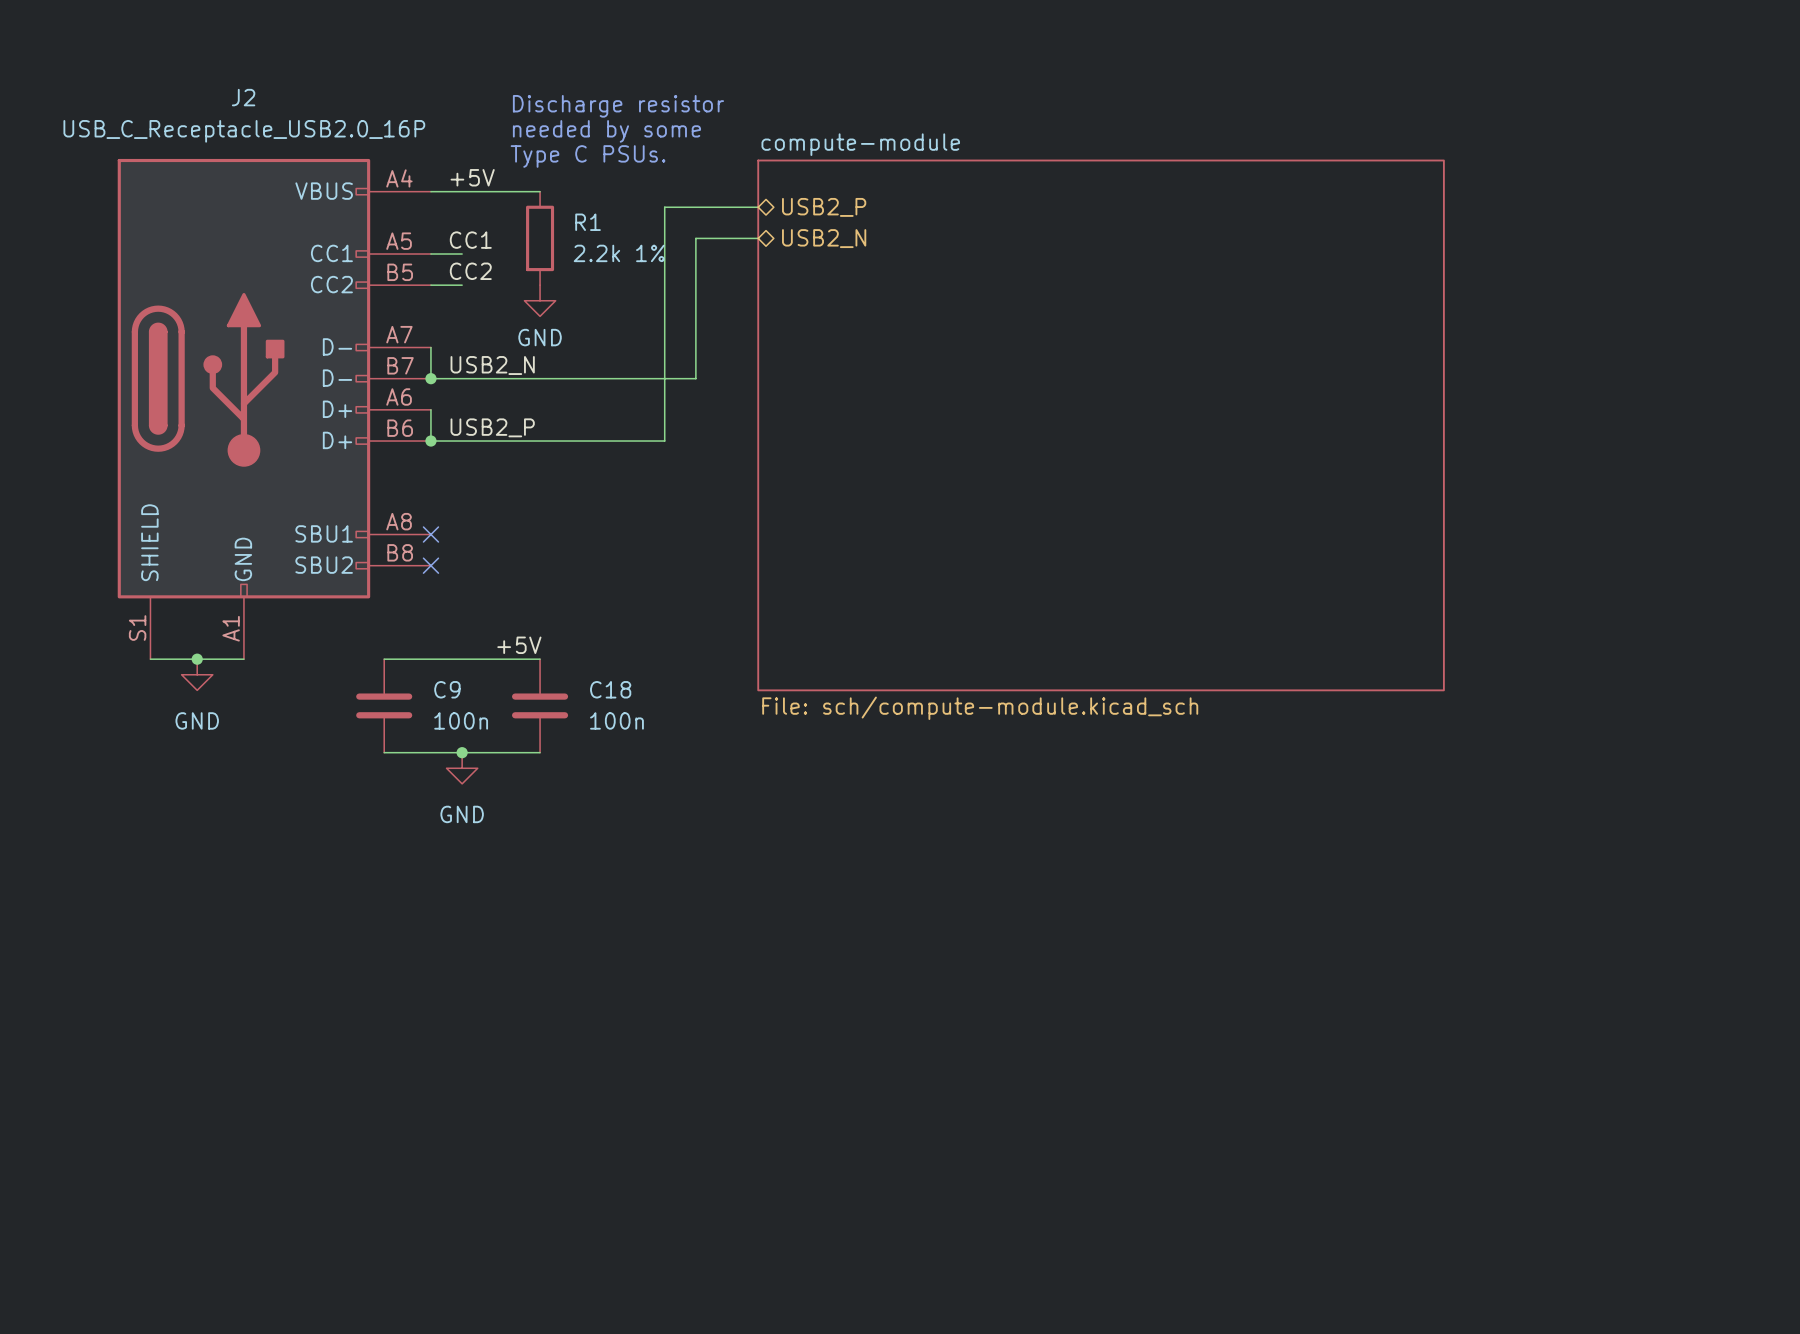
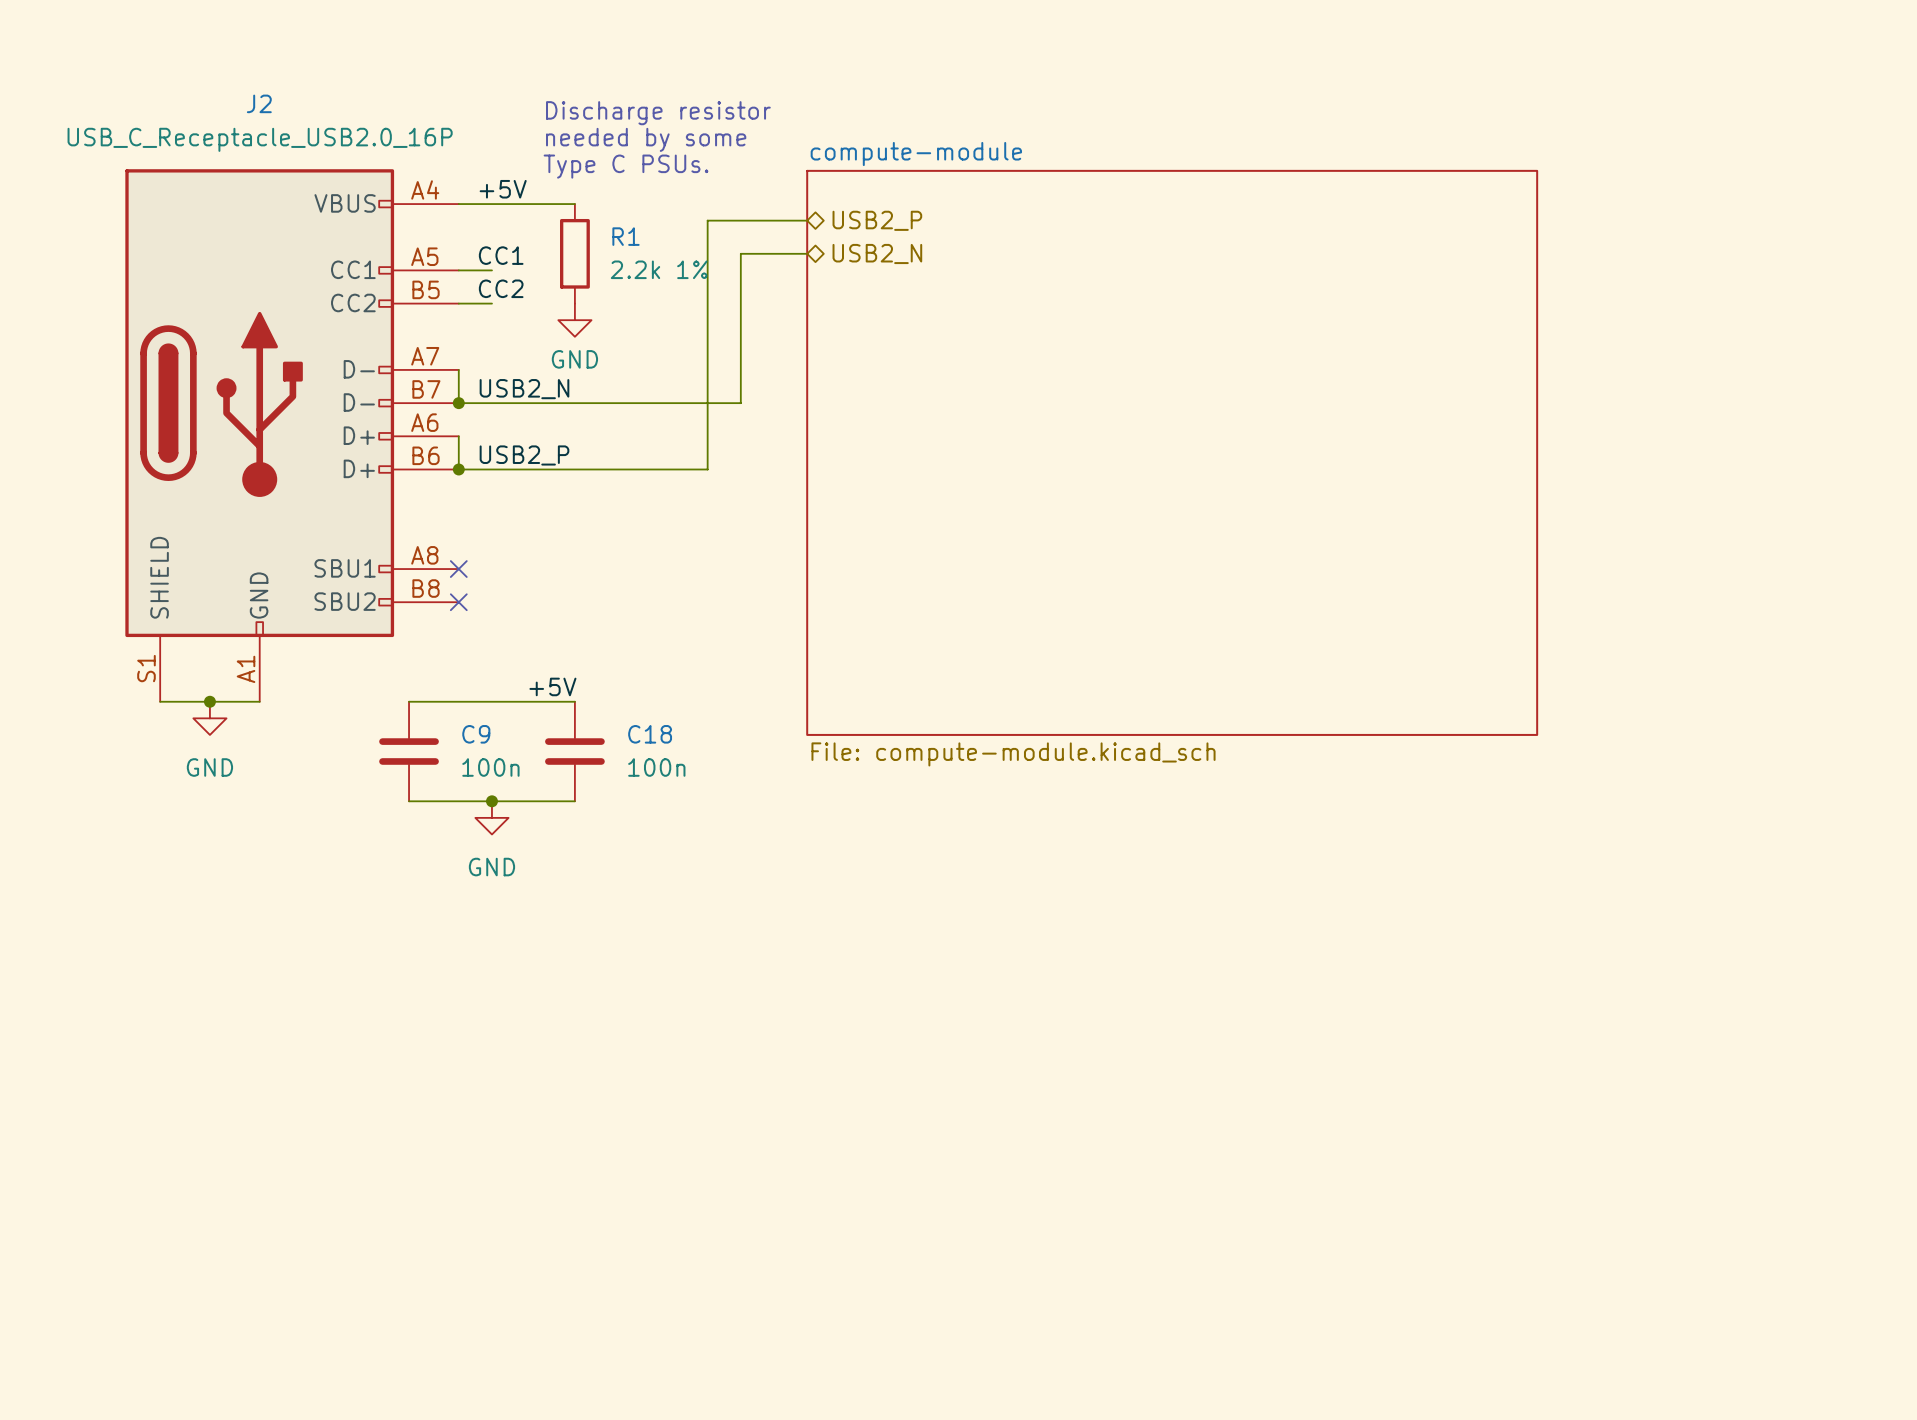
sheet compute-module value: File: sch/compute-module.kicad_sch (980, 708) -> File: compute-module.kicad_sch (1013, 754)

